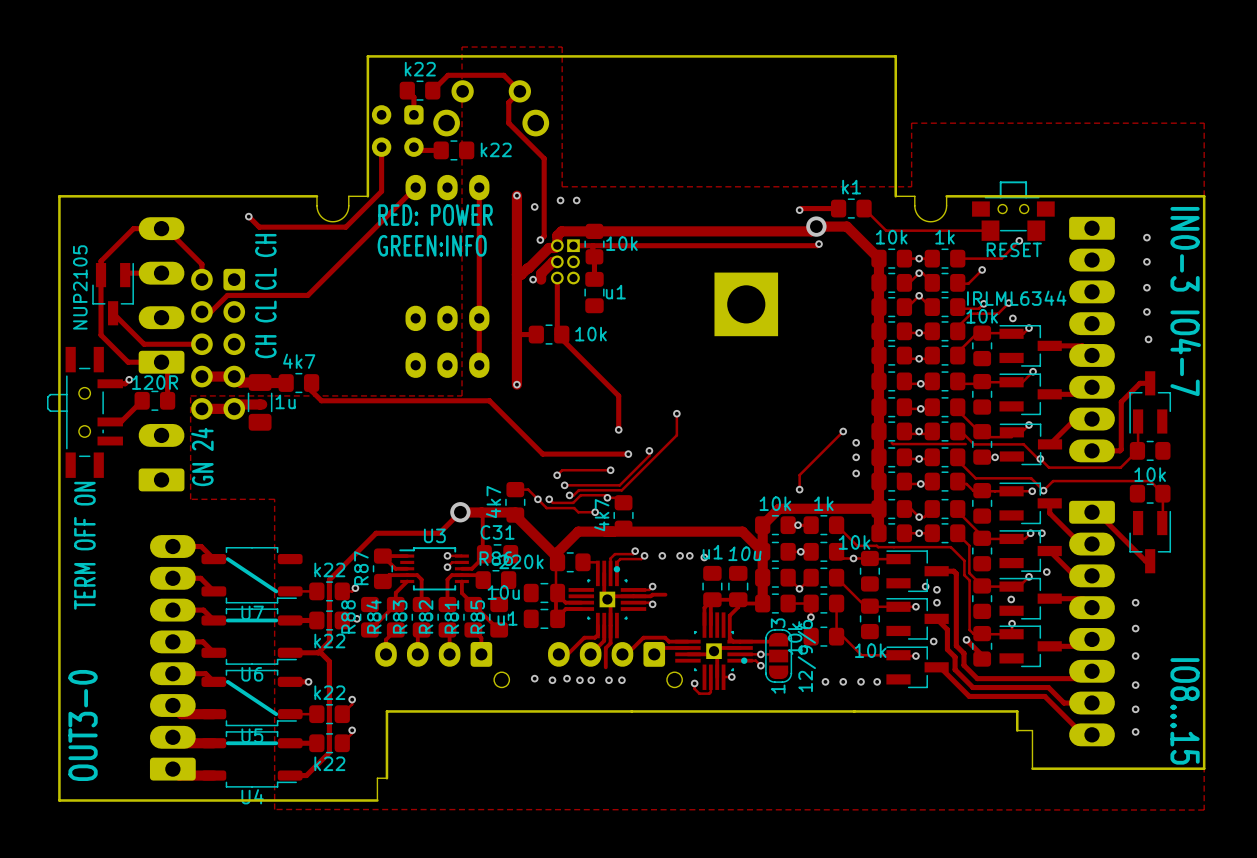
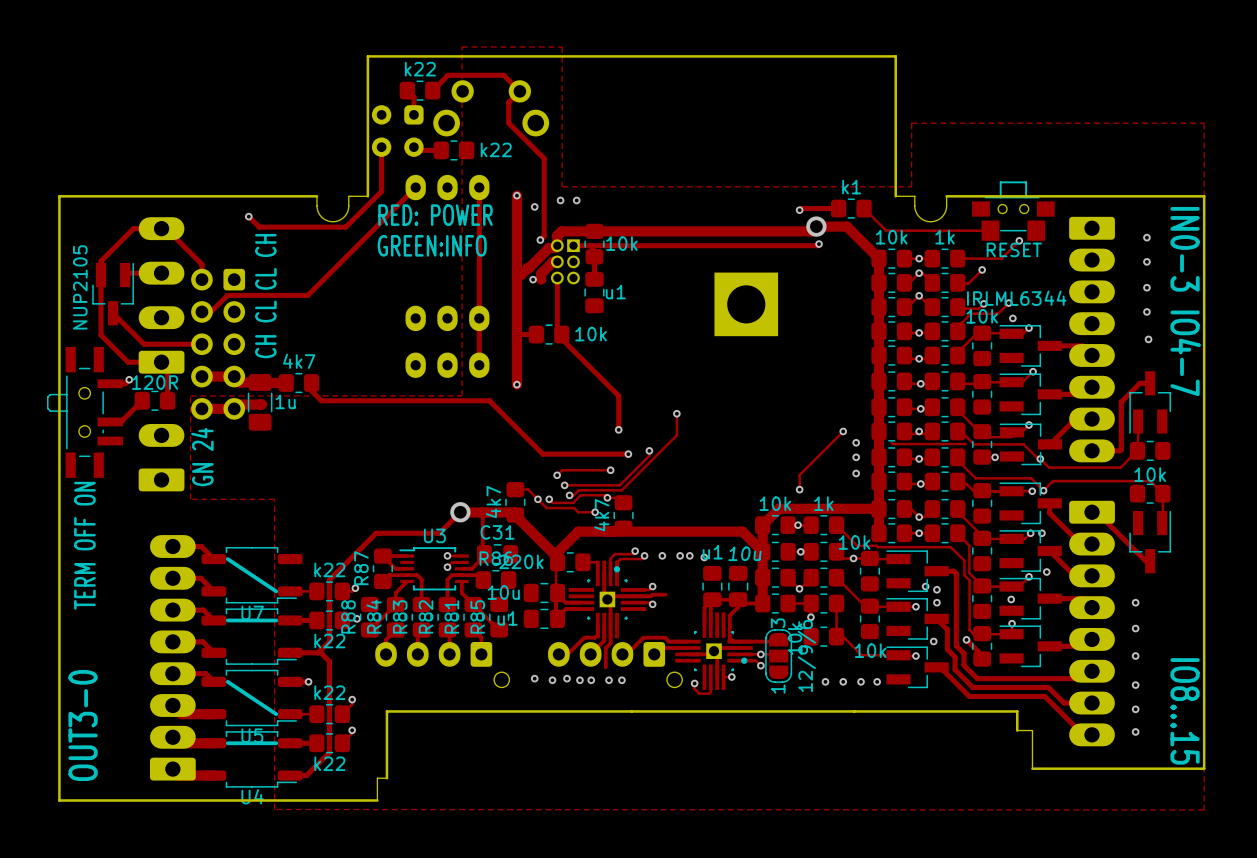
U6 name: U6 (252, 674) -> none

